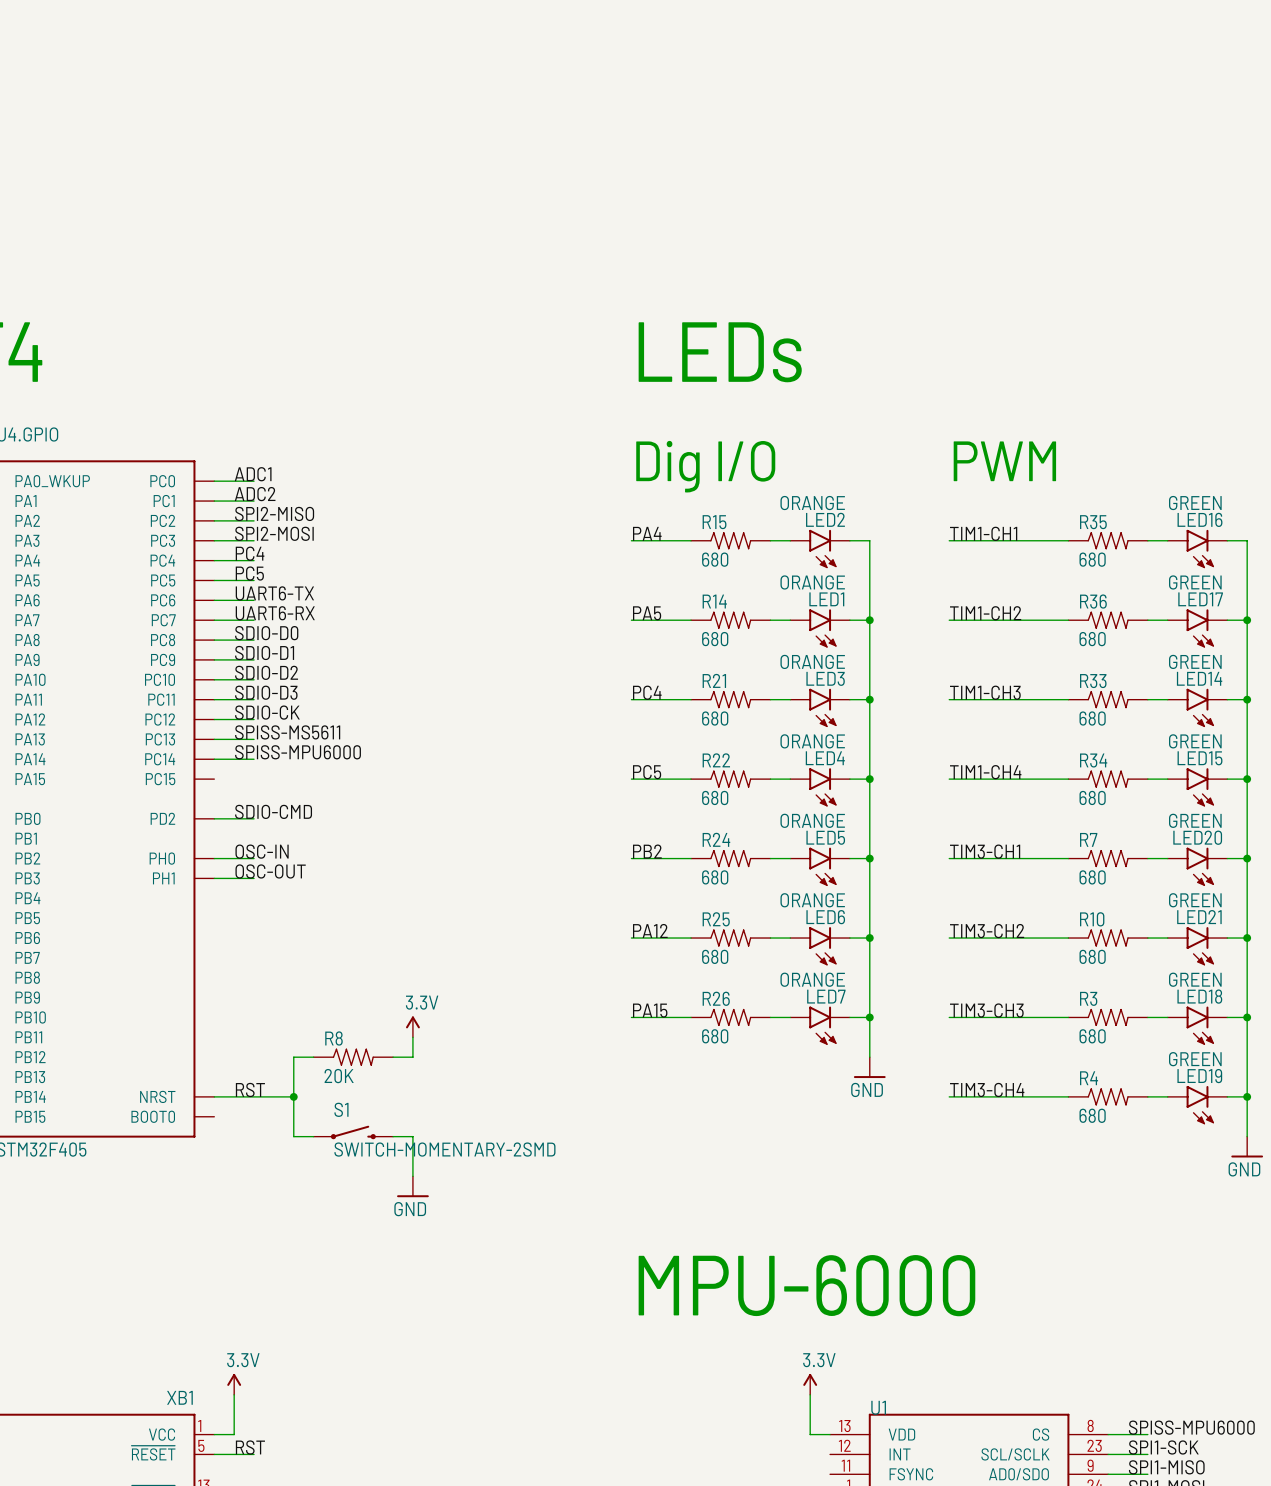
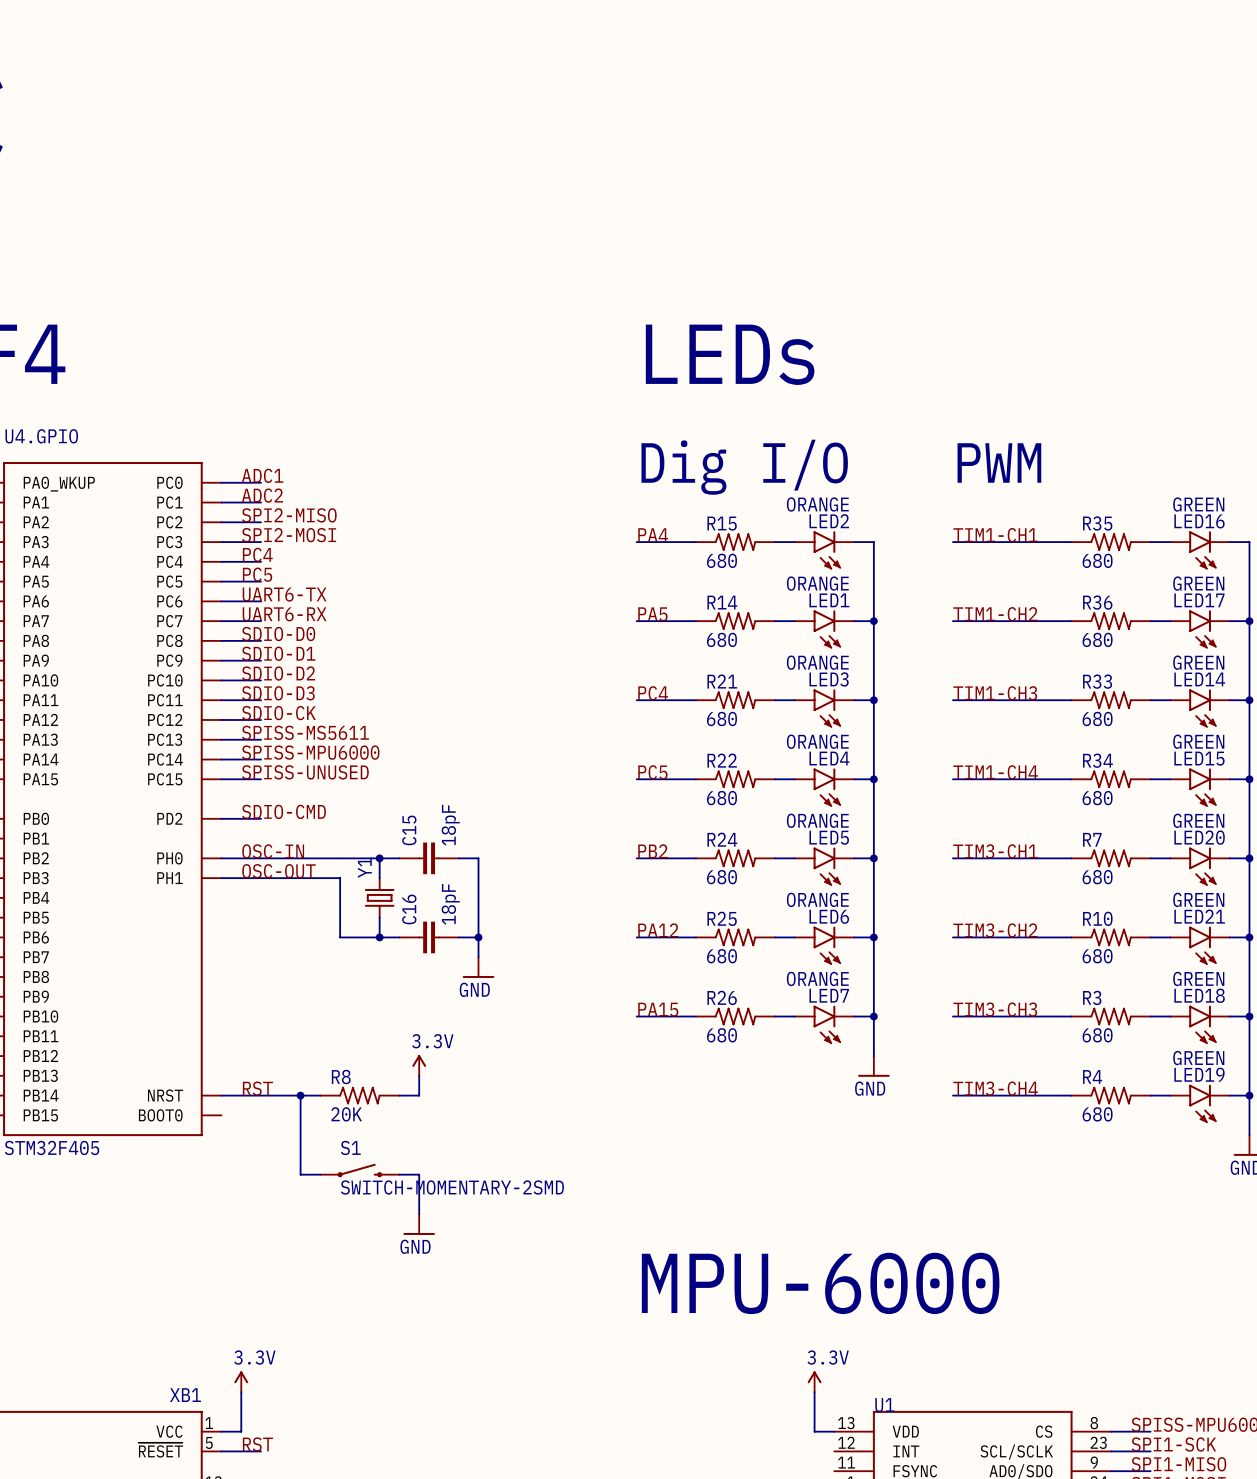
label: none -> SPISS-UNUSED (305, 772)
wire: none -> (221, 779) (261, 779)
wire: none -> (261, 858) (399, 858)
wire: none -> (379, 858) (379, 878)
junction: none -> (379, 858)
C15: none -> 18pF (429, 858)
wire: none -> (458, 858) (478, 858) (478, 957)
wire: none -> (261, 878) (340, 878) (340, 937) (399, 937)
Y1: none -> (379, 897)
wire: none -> (379, 917) (379, 937)
junction: none -> (379, 937)
C16: none -> 18pF (429, 937)
wire: none -> (458, 937) (478, 937)
junction: none -> (478, 937)
power symbol: none -> GND (478, 967)
power symbol position: 3.3V (412, 1026) -> 3.3V (419, 1065)
wire: (412, 1037) (412, 1057) (393, 1057) -> (419, 1075) (419, 1095) (399, 1095)
wire: (313, 1057) (293, 1057) (293, 1096) -> (320, 1095) (300, 1095)
R8 position: (353, 1057) -> (359, 1095)
S1 position: (353, 1132) -> (359, 1170)
wire: (293, 1136) (313, 1136) -> (300, 1135) (300, 1174) (320, 1174)
wire: (393, 1136) (412, 1136) (412, 1176) -> (399, 1174) (419, 1174) (419, 1214)
power symbol position: GND (412, 1186) -> GND (419, 1224)

